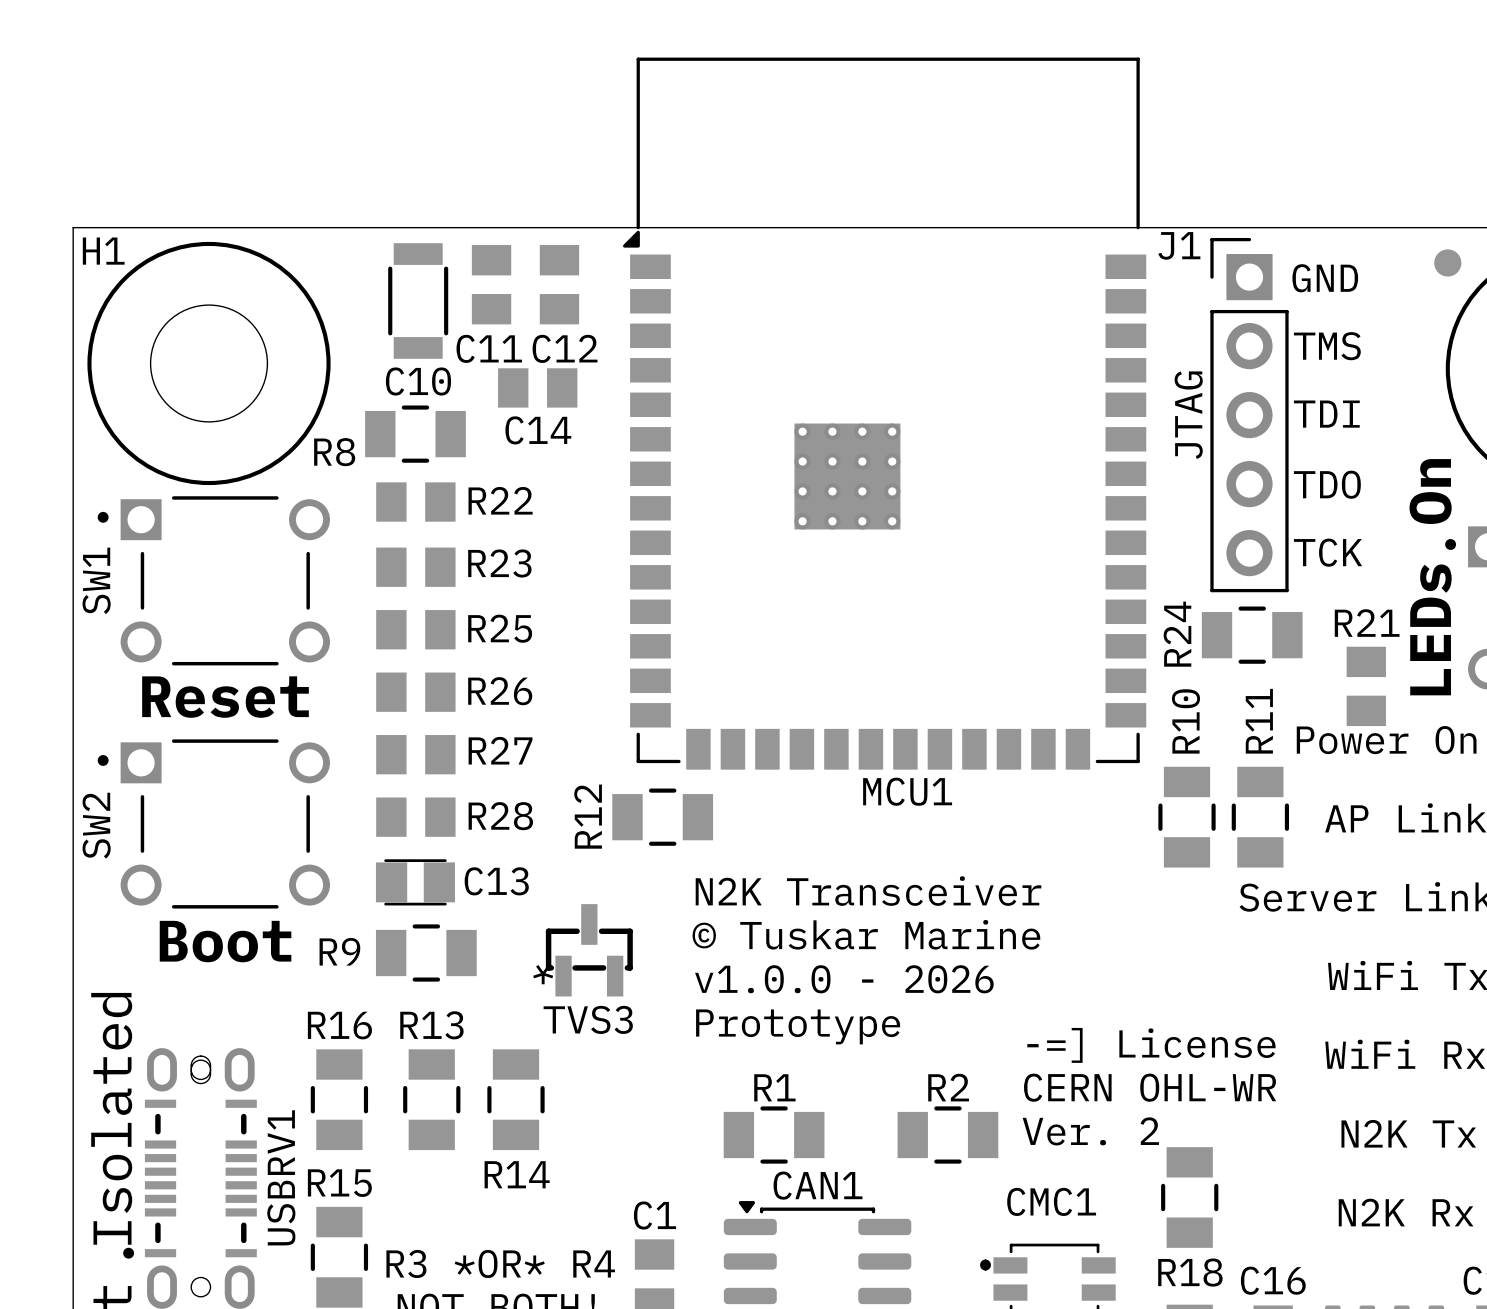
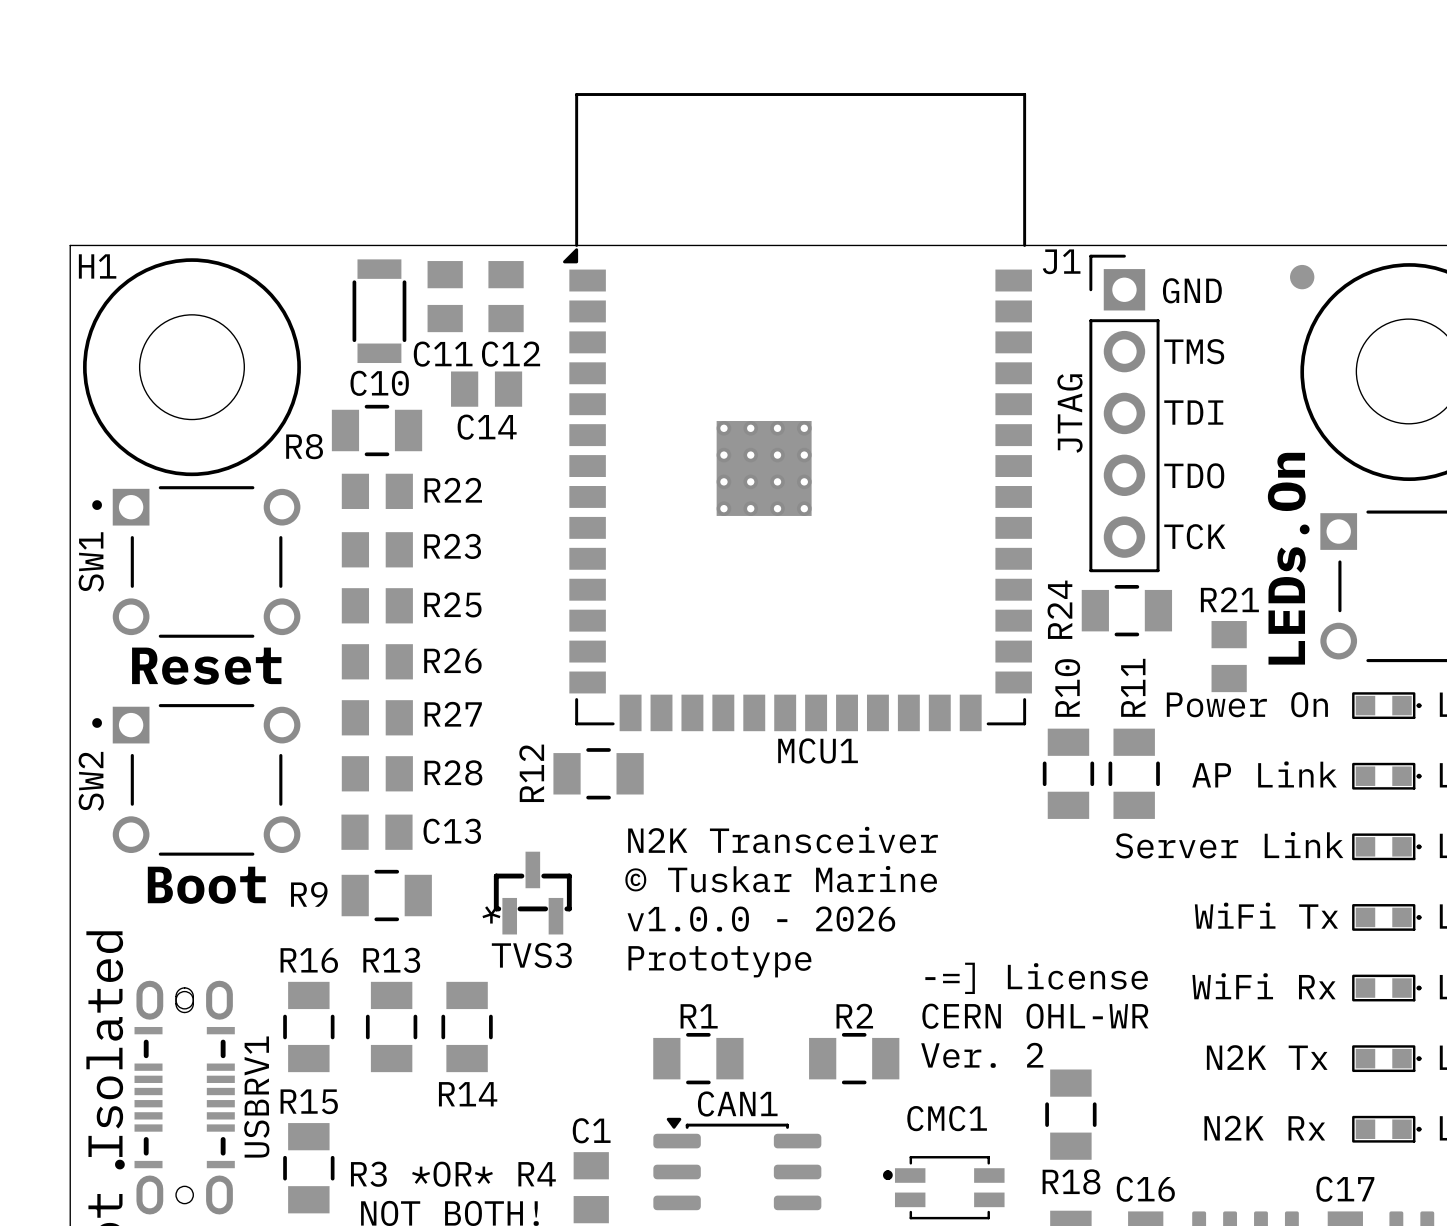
C13 footprint: [375, 859, 456, 906] -> [341, 814, 413, 850]

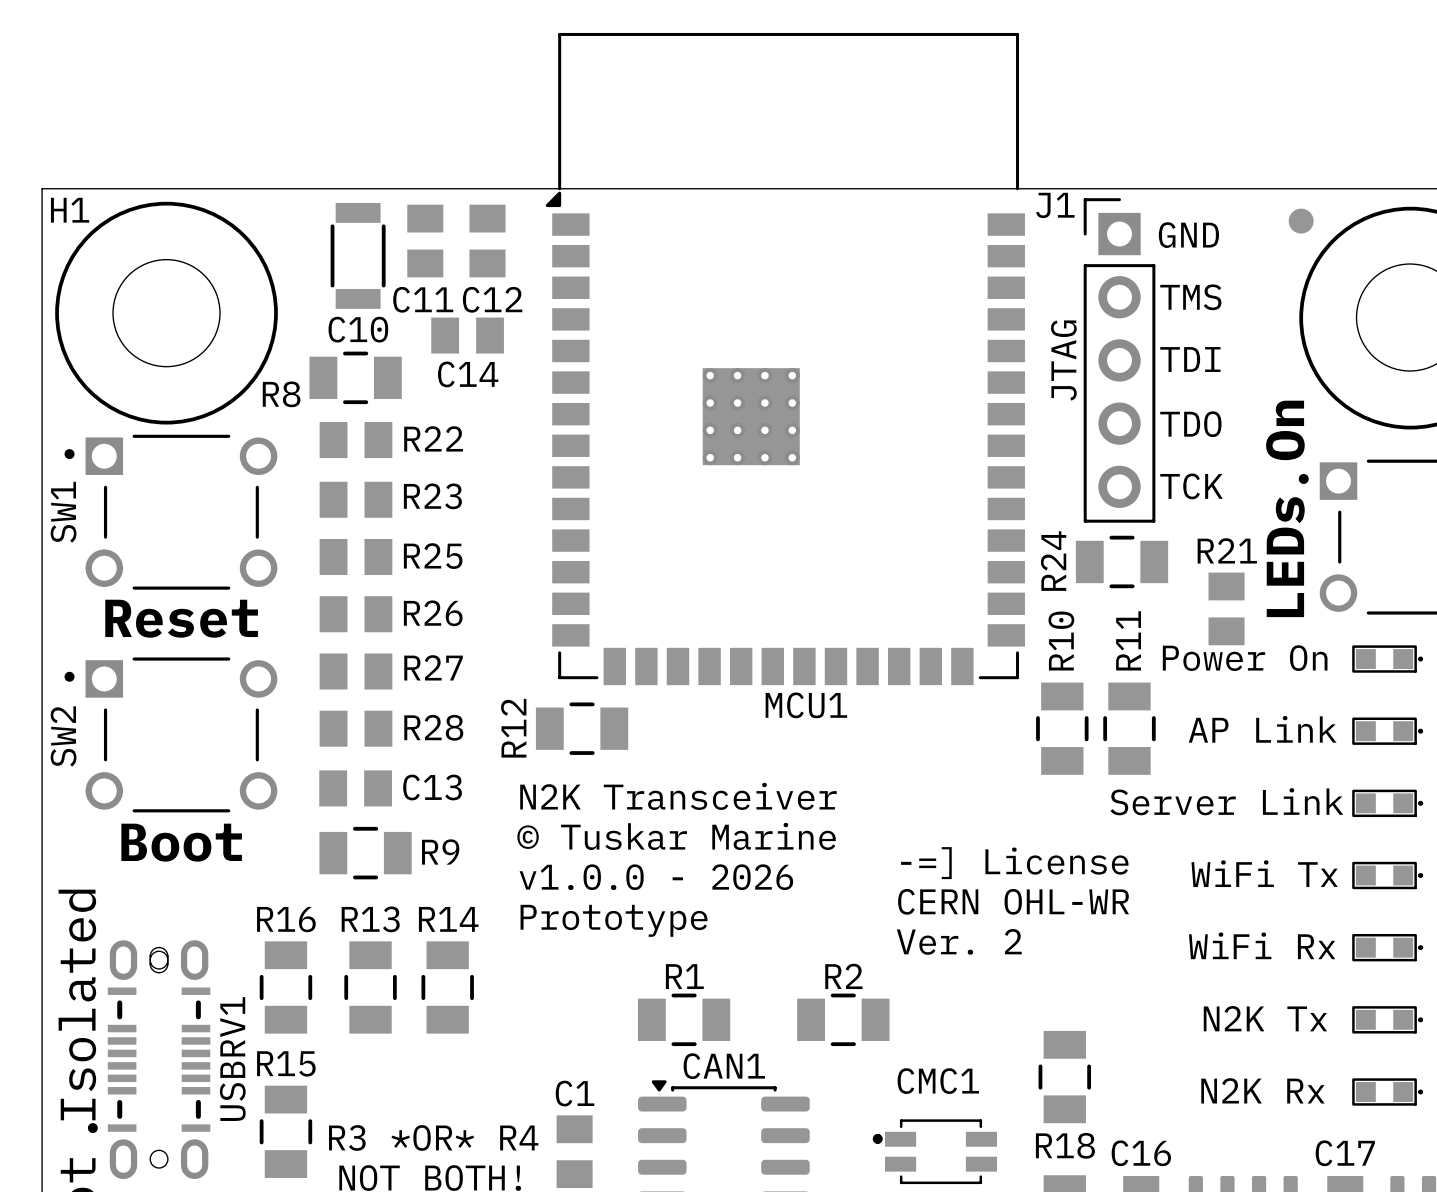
text position: N2K Transceiver (783, 840) -> N2K Transceiver (678, 796)
text position: © Tuskar Marine (781, 879) -> © Tuskar Marine (676, 836)
TVS3: (532, 893) -> none
R9 name position: R9 (309, 894) -> R9 (440, 851)
text: none -> -=] License (1014, 863)
text position: v1.0.0 - 2026 (761, 919) -> v1.0.0 - 2026 (656, 877)
text position: Prototype (719, 961) -> Prototype (614, 920)
text: -=] License (1036, 978) -> Ver. 2 (959, 941)
text position: CERN OHL-WR (1035, 1016) -> CERN OHL-WR (1013, 901)
text: Ver. 2 (982, 1055) -> none
R14 name position: R14 (468, 1094) -> R14 (448, 919)

